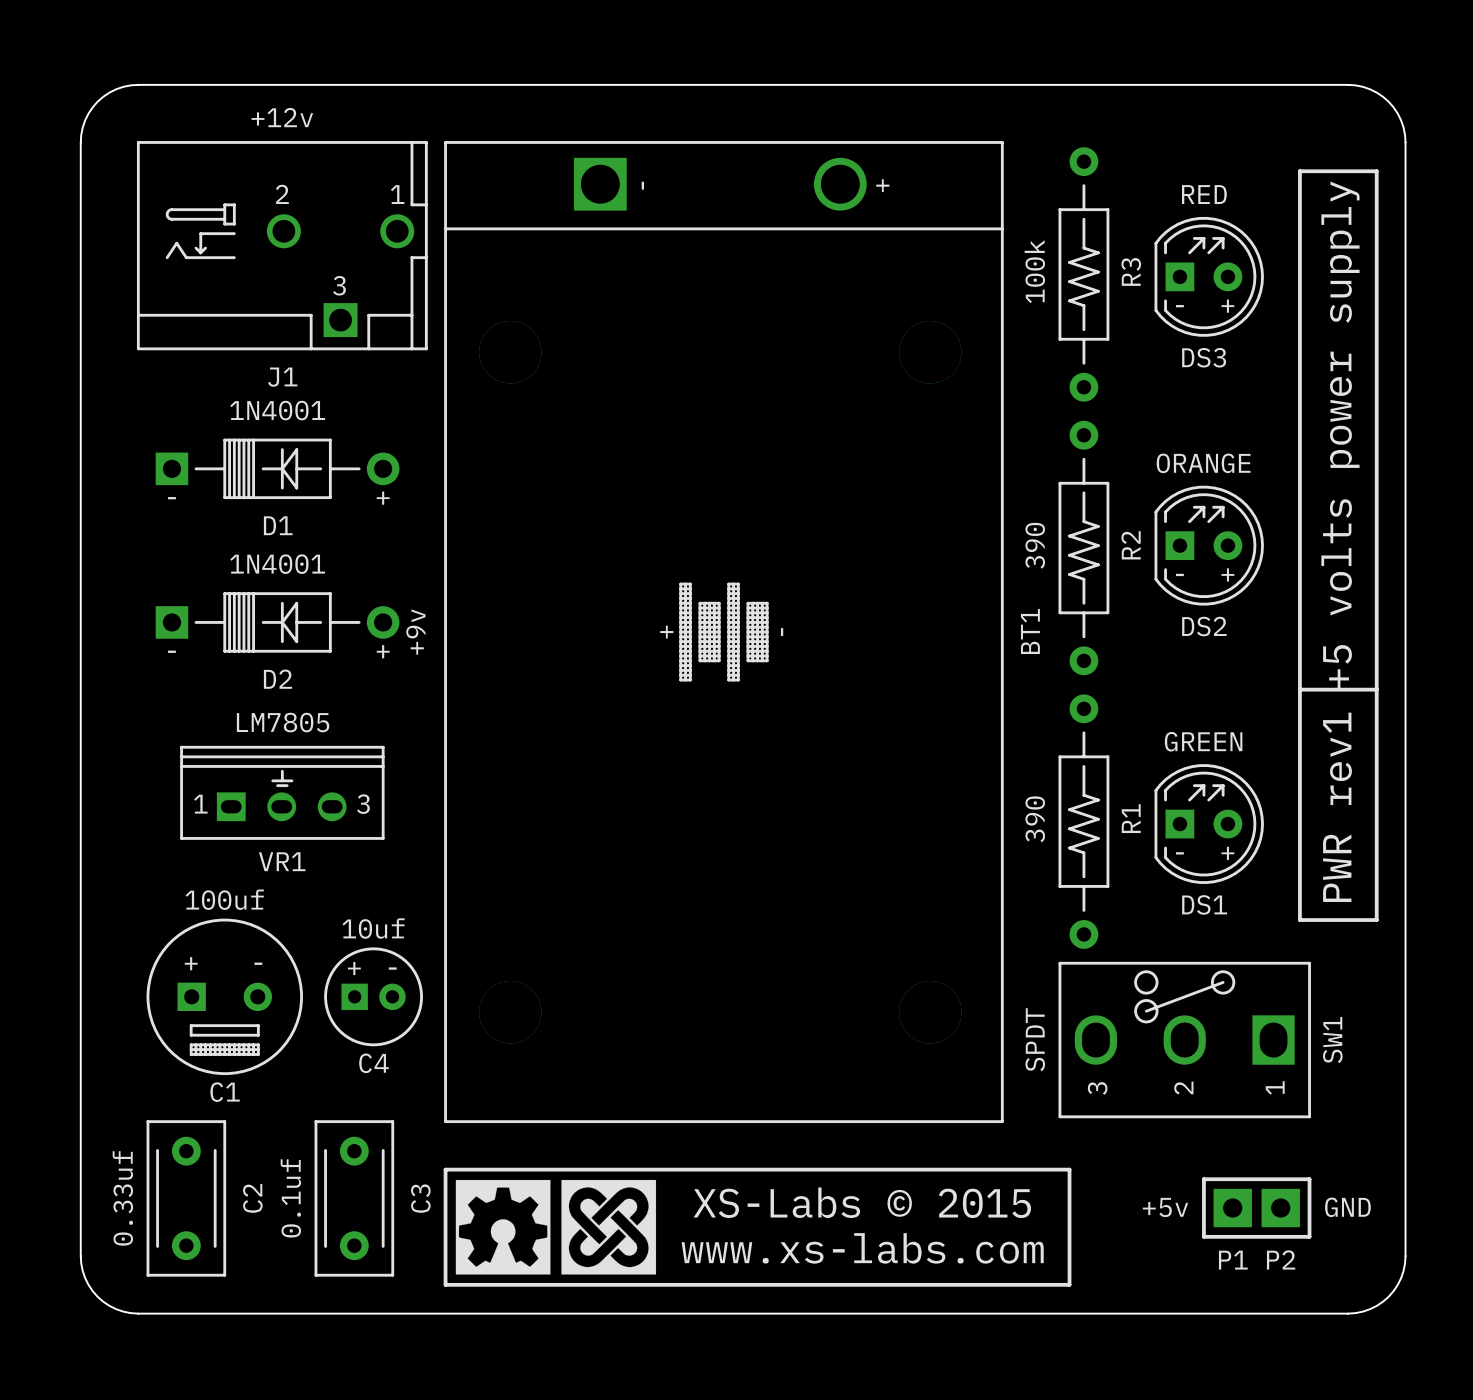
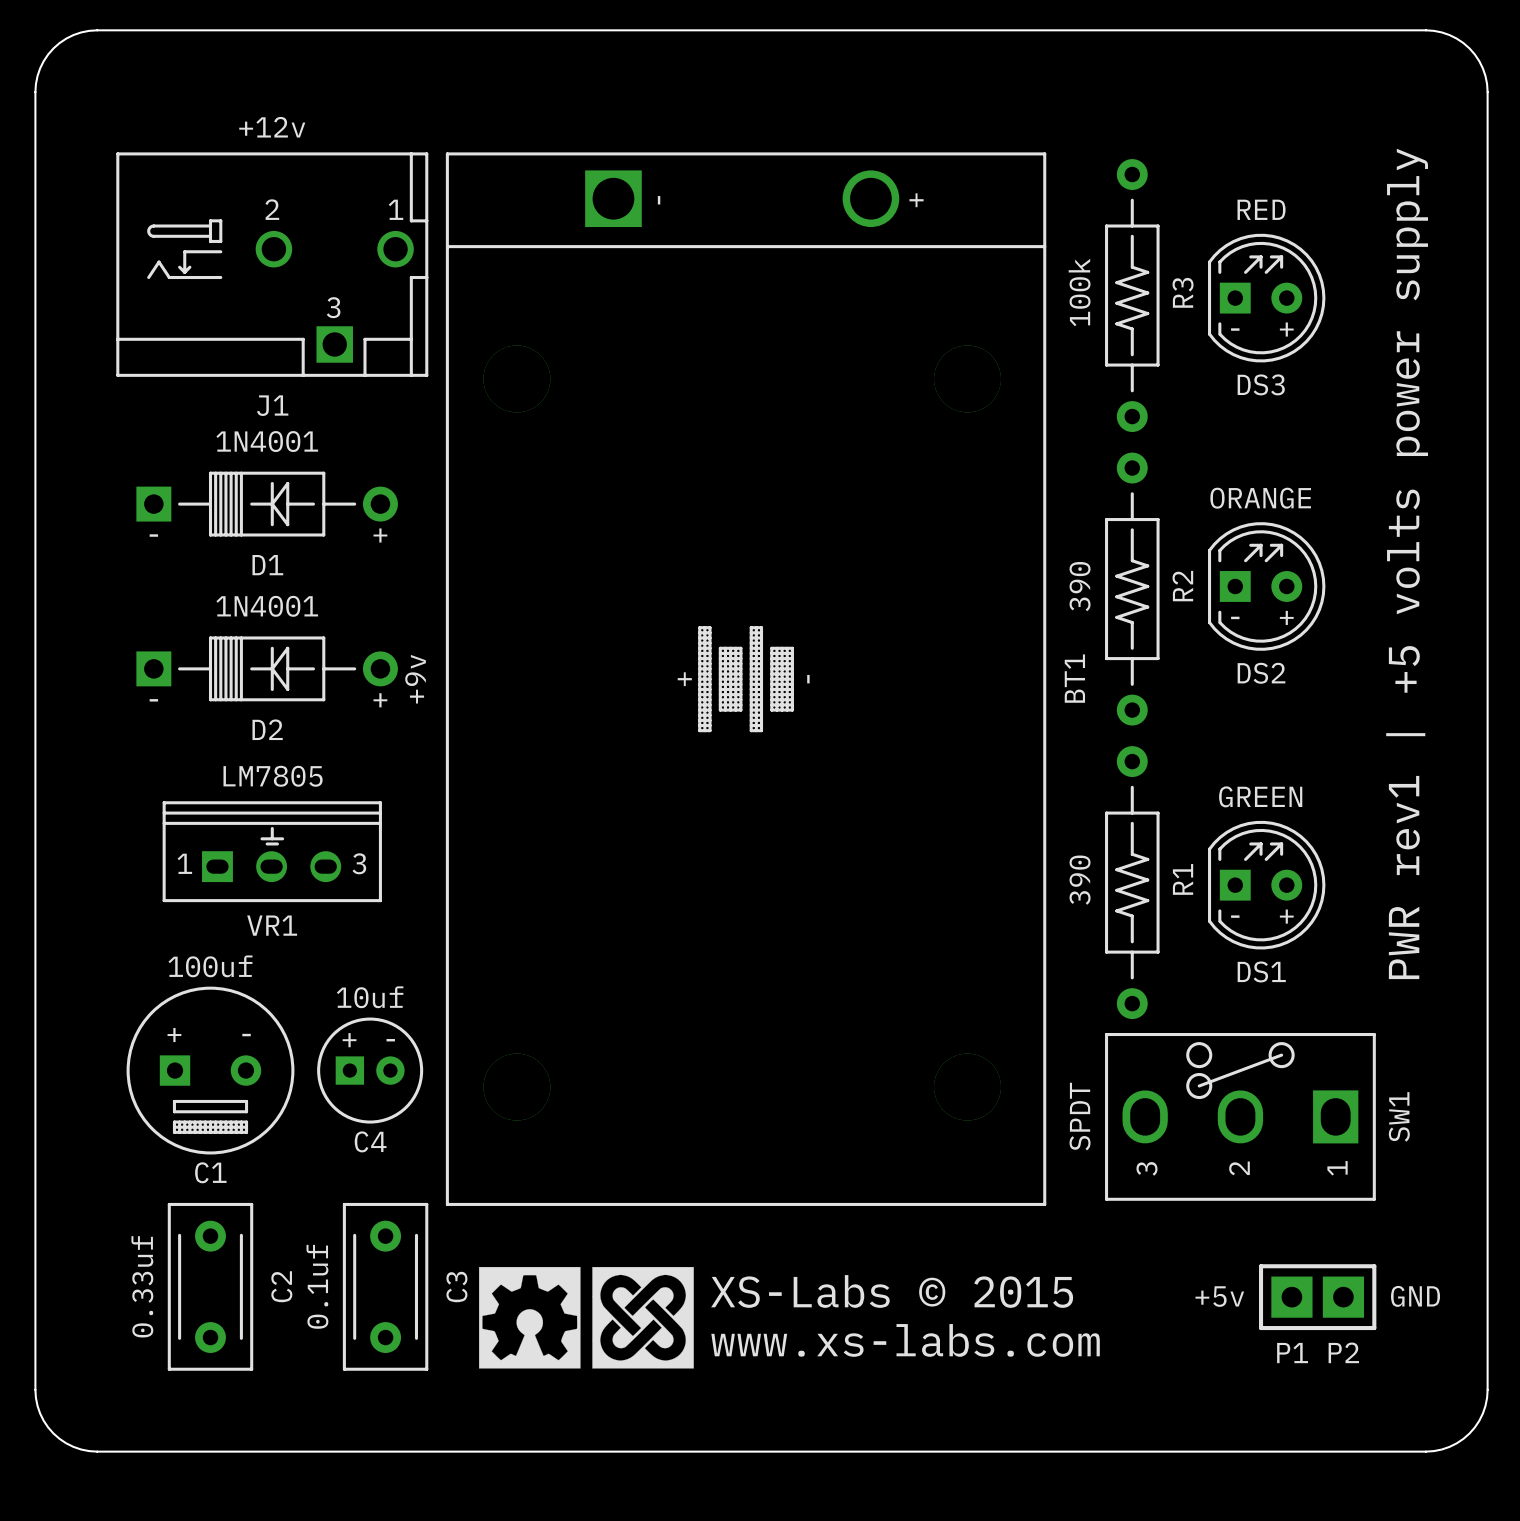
board edge: (138, 84) (1347, 84) (1369, 89) (1388, 101) (1401, 120) (1405, 142) (1405, 1256) (1401, 1278) (1388, 1296) (1369, 1309) (1347, 1313) (138, 1313) (116, 1309) (97, 1296) (85, 1278) (80, 1256) (80, 142) (85, 120) (97, 101) (116, 89) (138, 84) -> (97, 30) (73, 35) (53, 48) (40, 68) (35, 92) (35, 1389) (40, 1413) (53, 1433) (73, 1446) (97, 1451) (1425, 1451) (1449, 1446) (1469, 1433) (1482, 1413) (1487, 1389) (1487, 92) (1482, 68) (1469, 48) (1449, 35) (1425, 30) (97, 30)
line: (1299, 171) (1299, 920) (1376, 920) (1376, 171) (1299, 171) -> none
text: +5 volts power supply (1340, 435) -> none
line: (1299, 689) (1376, 689) -> none
text: PWR rev1 (1337, 807) -> PWR rev1 | +5 volts power supply (1407, 563)
line: (445, 1169) (1069, 1169) (1069, 1284) (445, 1284) (445, 1169) -> none
C2 position: (186, 1198) -> (210, 1286)
C3 position: (354, 1198) -> (385, 1286)
text position: XS-Labs © 2015 (862, 1202) -> XS-Labs © 2015 (892, 1291)
drawing position: (503, 1227) -> (529, 1317)
drawing position: (608, 1227) -> (643, 1317)
text position: www.xs-labs.com (862, 1248) -> www.xs-labs.com (905, 1340)

